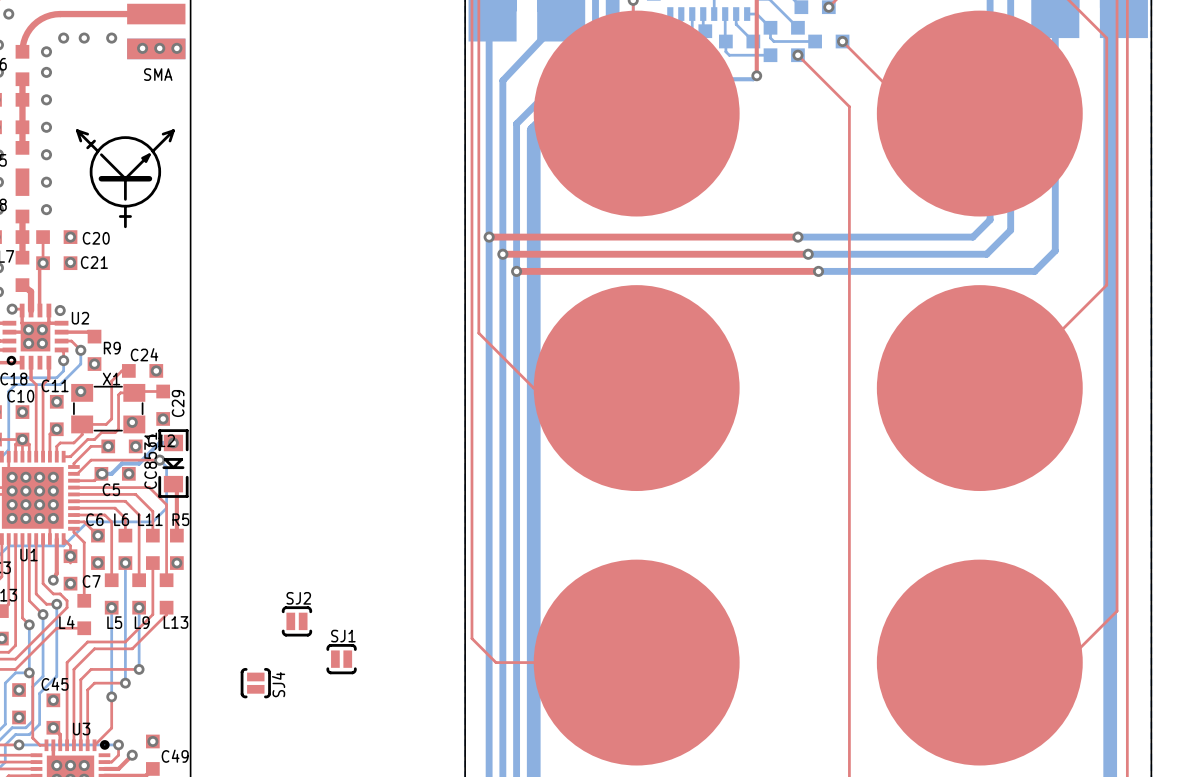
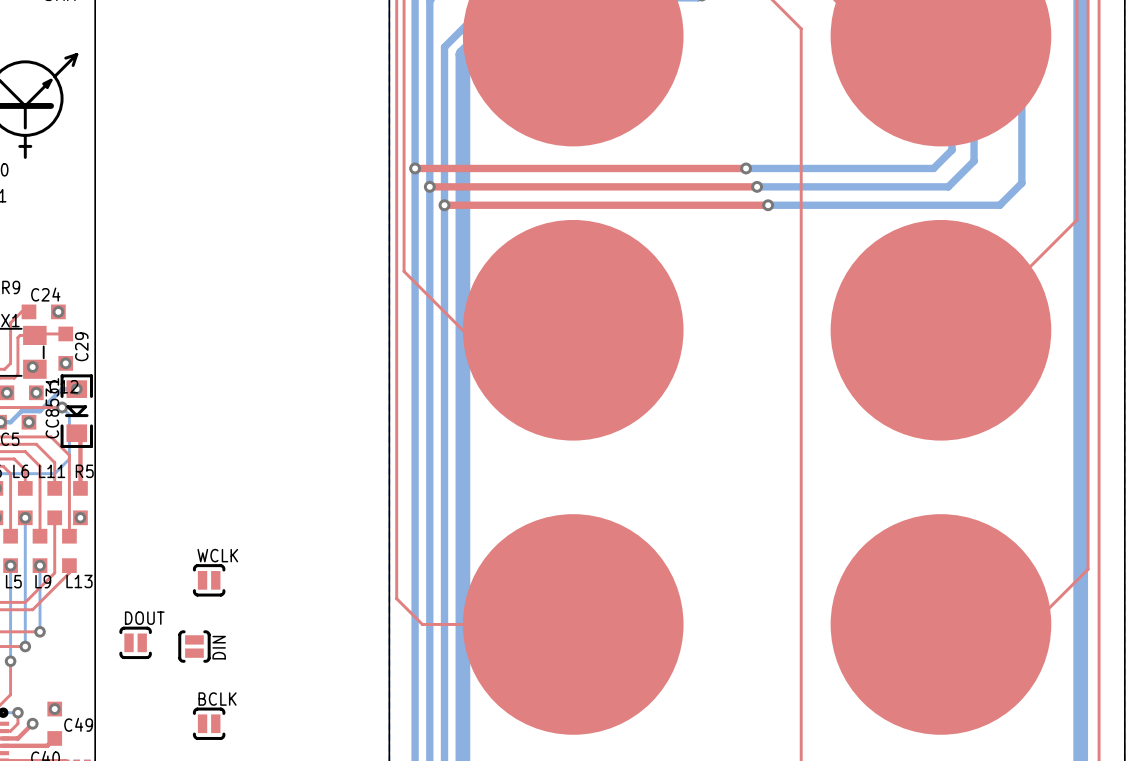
SJ2 name: SJ2 (298, 598) -> WCLK (217, 555)
SJ1: (341, 659) -> none
DOUT: none -> (135, 642)
SJ4: (255, 683) -> none
DIN: none -> (194, 646)
BCLK: none -> (209, 723)

